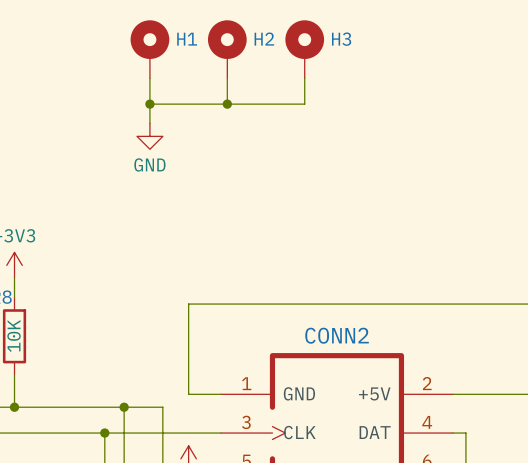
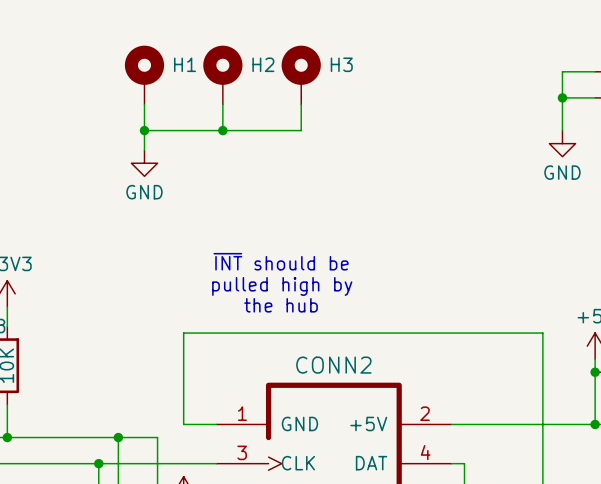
text: none -> ~{INT} should be (281, 261)
text: none -> pulled high by (282, 286)
text: none -> the hub (281, 305)

